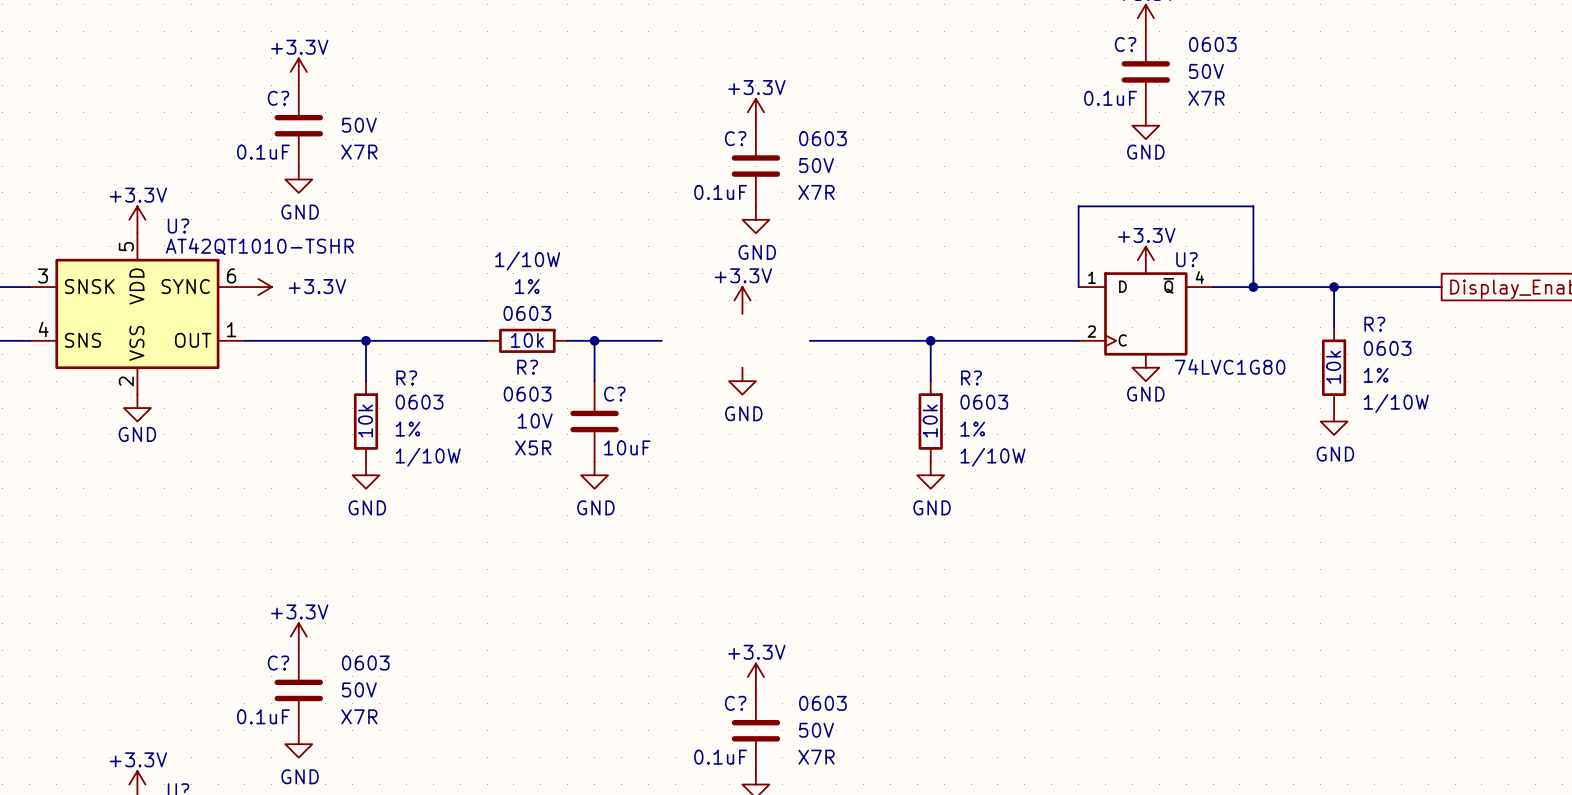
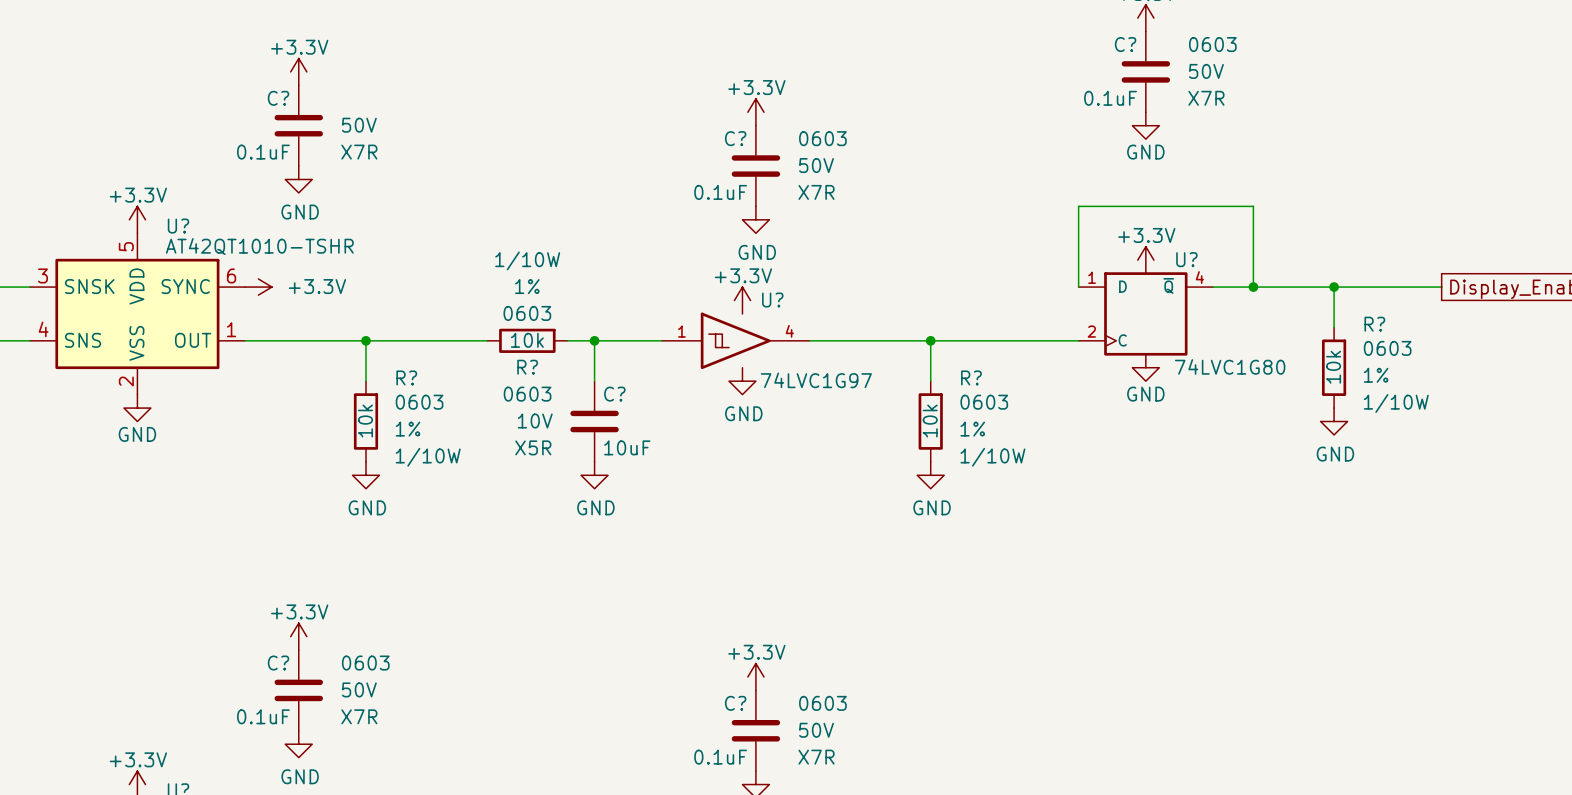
U?: none -> 74LVC1G97 (735, 340)

